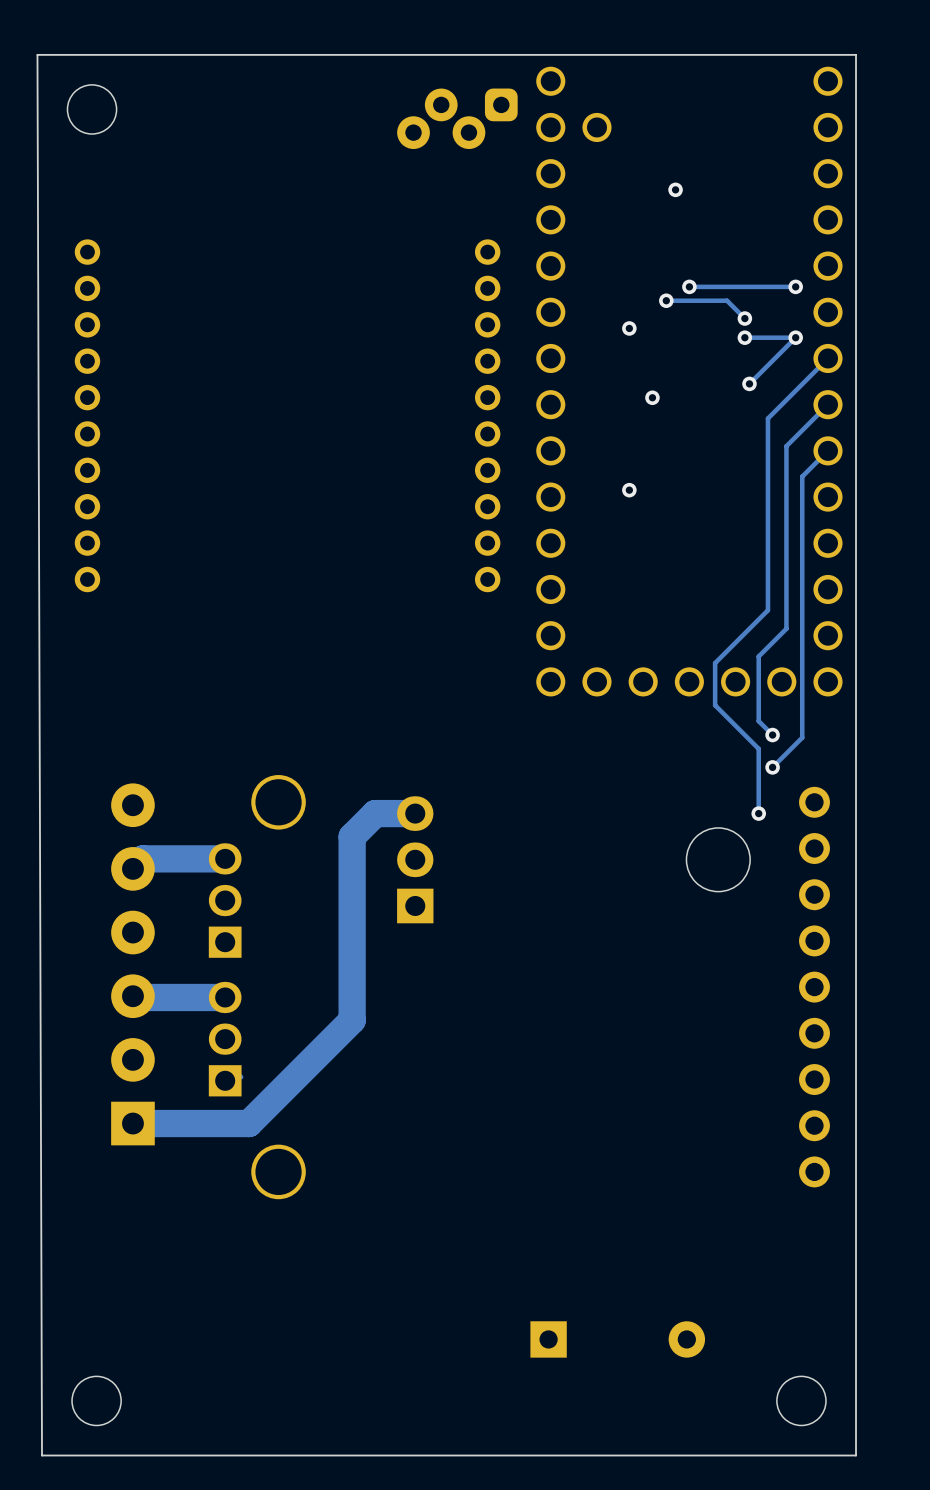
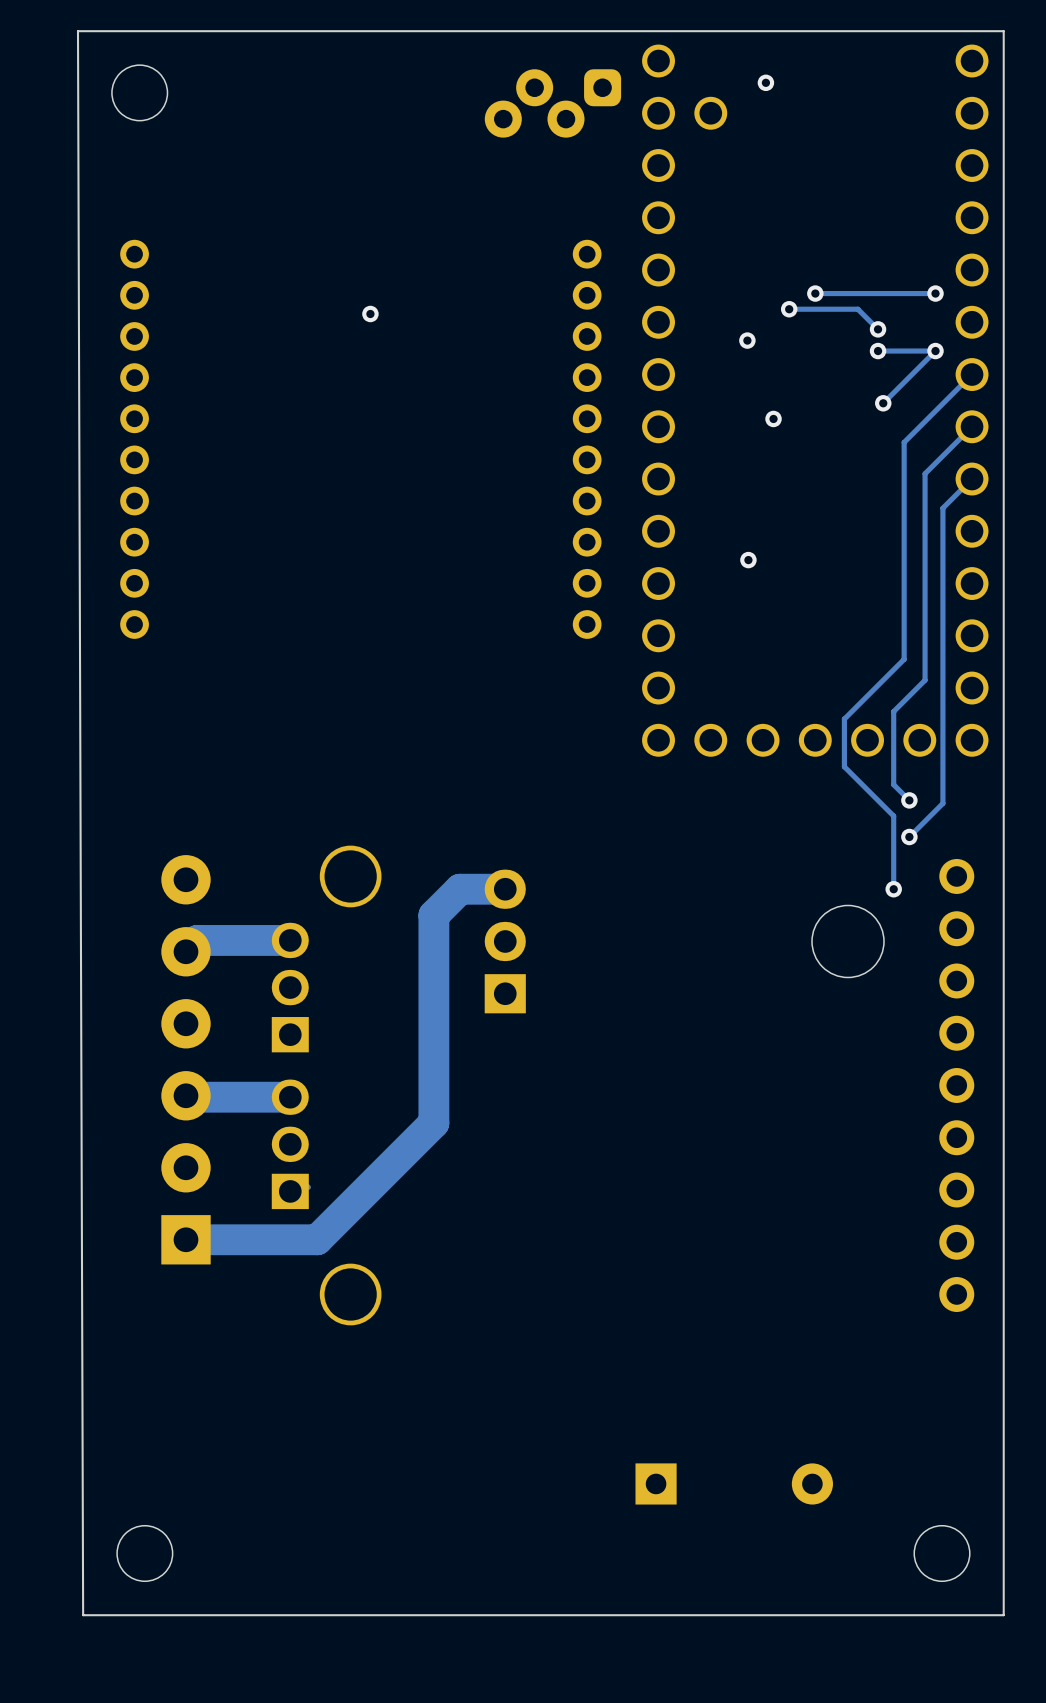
via position: (675, 189) -> (765, 82)
via: none -> (370, 313)
via position: (629, 490) -> (748, 560)

